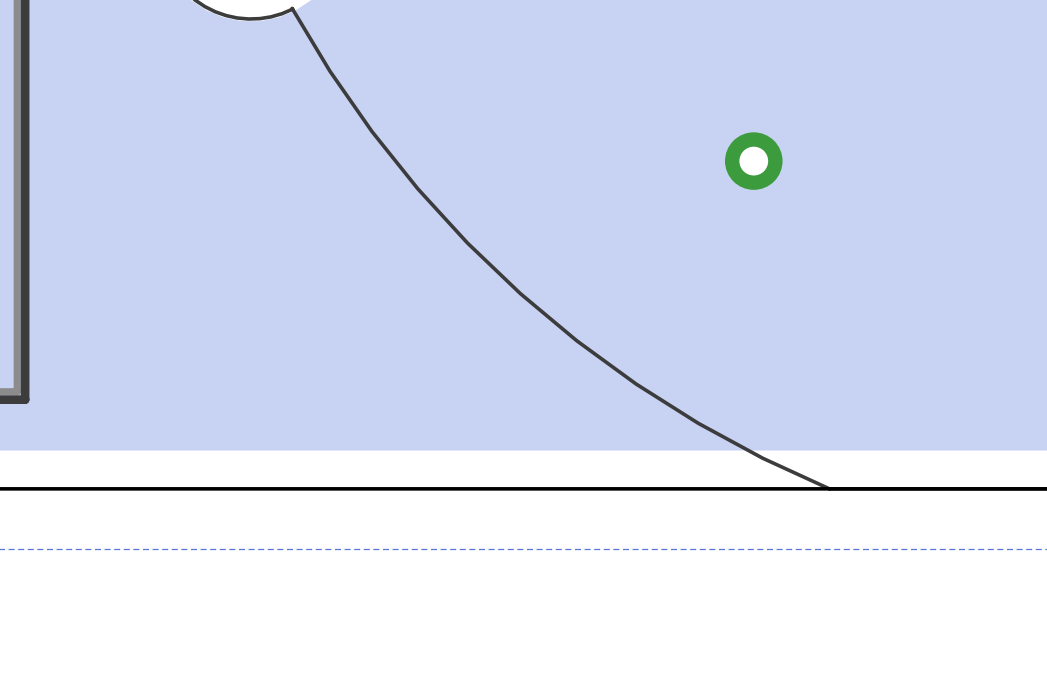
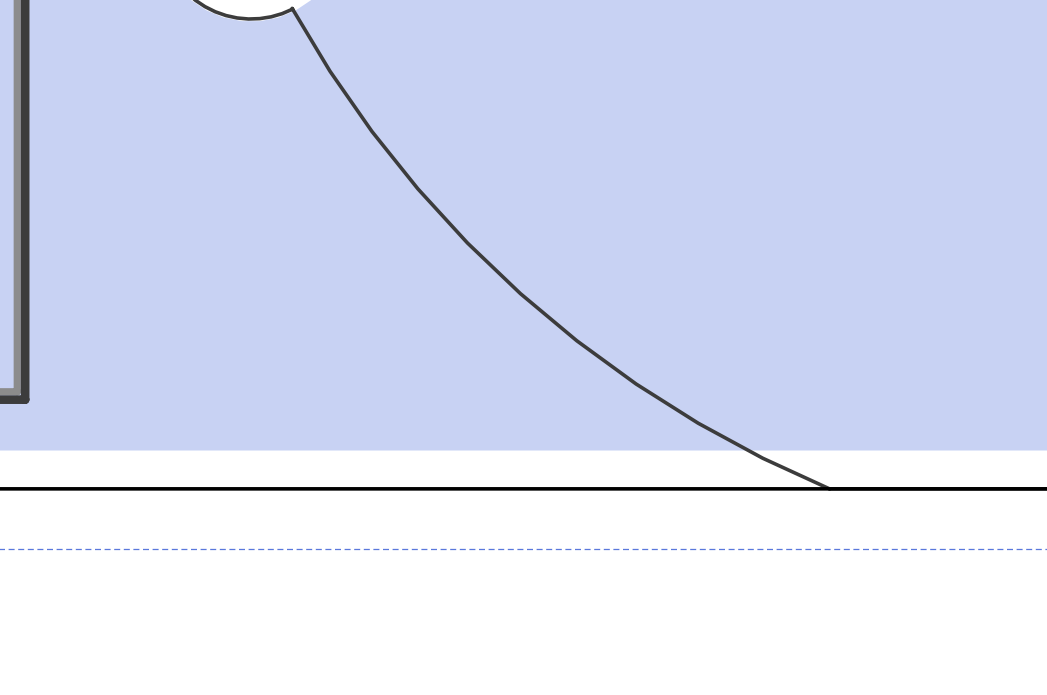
via: (753, 161) -> none

